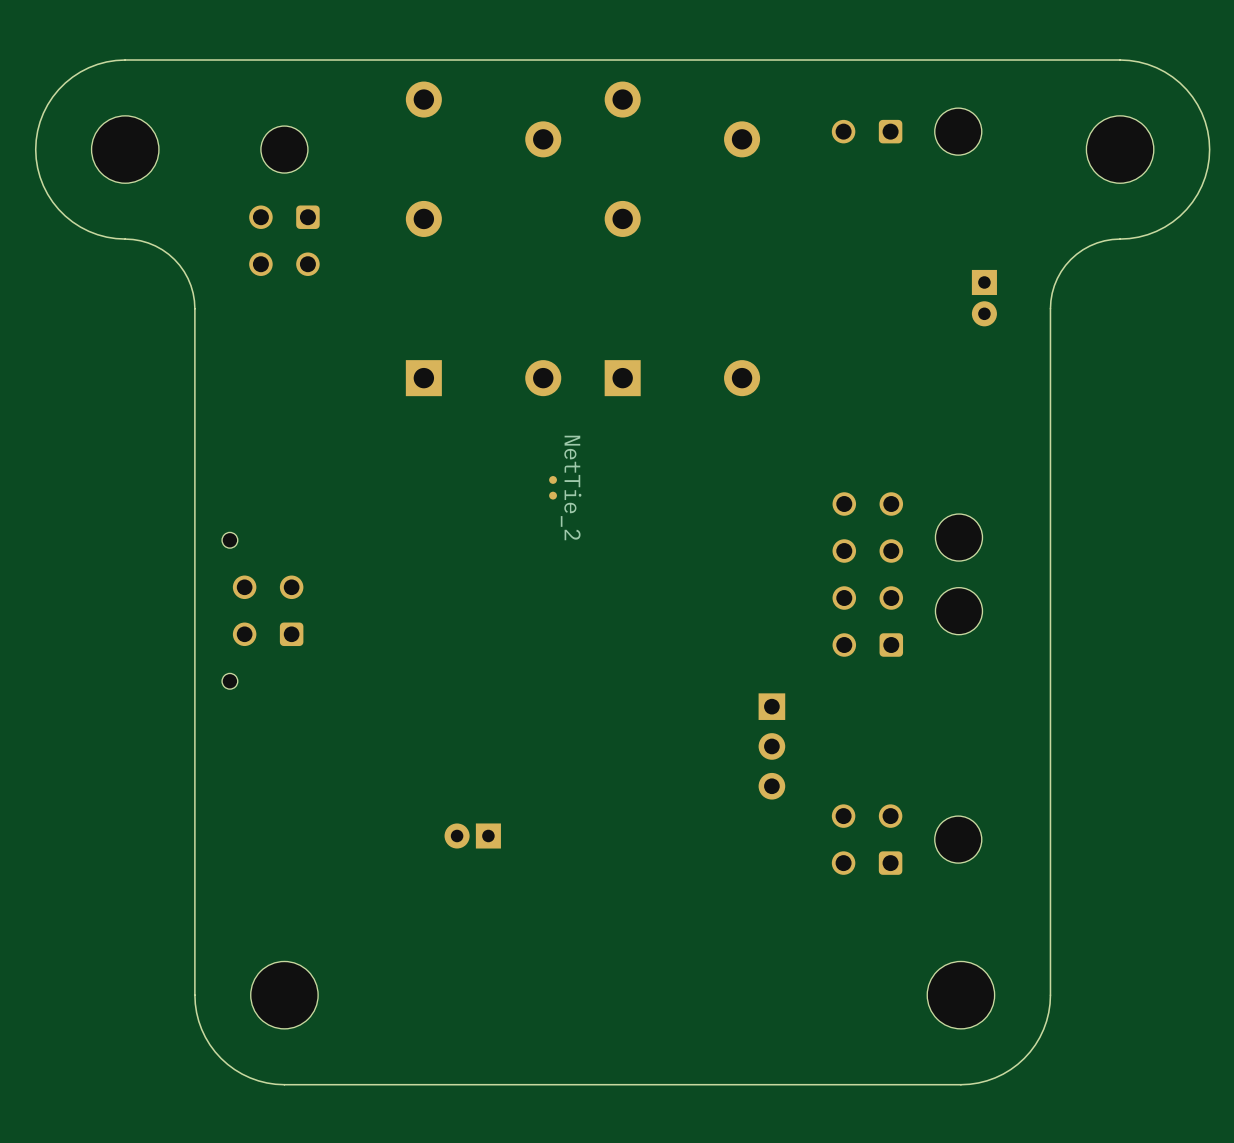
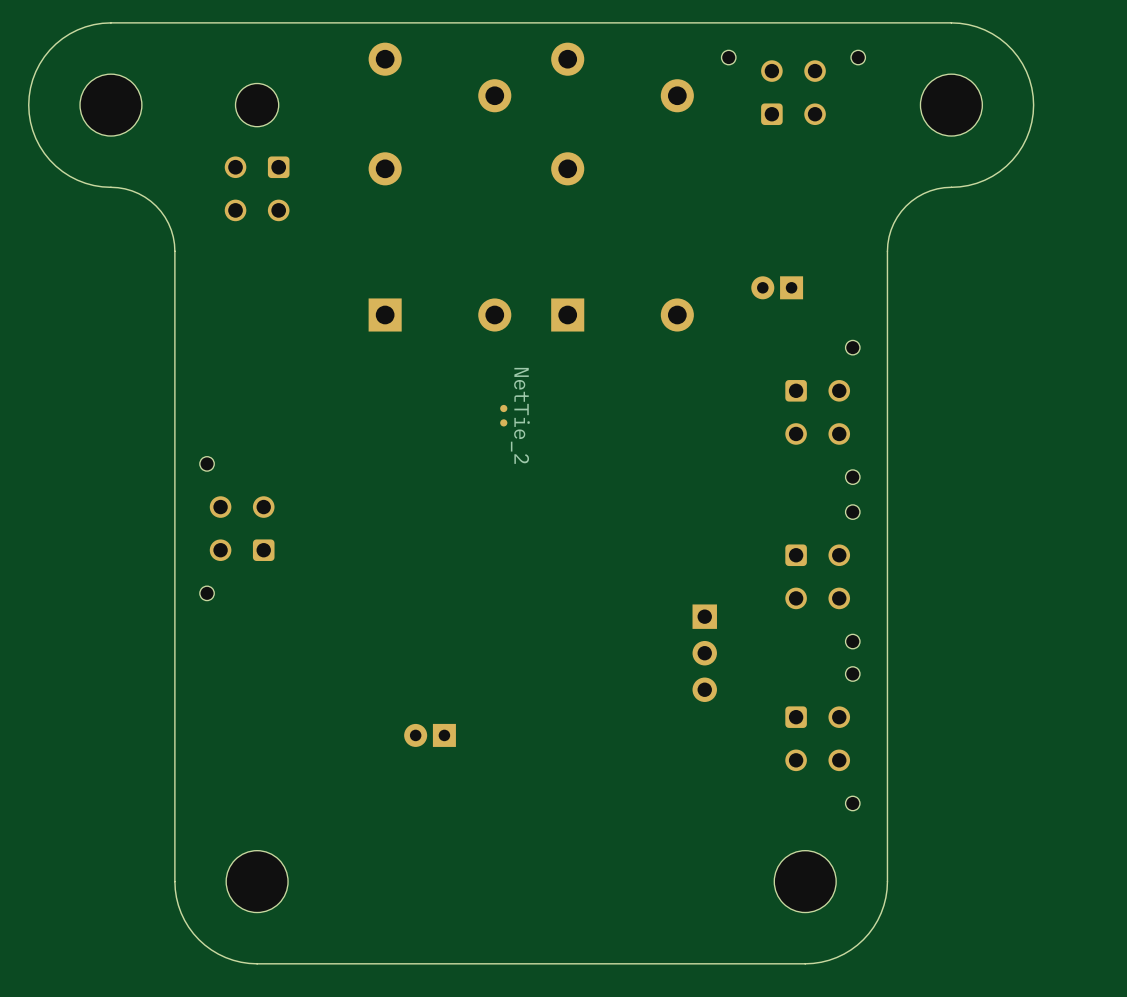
board edge: (1040, 60) (1129, 60) (1147, 64) (1164, 72) (1186, 89) (1201, 113) (1207, 130) (1209, 158) (1201, 185) (1192, 202) (1180, 216) (1164, 227) (1147, 234) (1104, 240) (1083, 249) (1065, 265) (1057, 278) (1052, 293) (1050, 308) (1050, 995) (1046, 1021) (1039, 1037) (1024, 1058) (1010, 1069) (995, 1077) (969, 1084) (881, 1084) -> (951, 22) (968, 24) (984, 29) (999, 38) (1012, 50) (1022, 63) (1029, 79) (1033, 96) (1033, 113) (1026, 138) (1017, 153) (1006, 166) (992, 176) (976, 183) (937, 188) (917, 197) (901, 211) (893, 223) (889, 237) (887, 251) (887, 889) (881, 913) (873, 927) (863, 939) (850, 949) (836, 957) (821, 962) (805, 963)
part: none -> (793, 87)
part: (906, 131) -> none
part position: (1120, 149) -> (951, 105)
part rotation: 0° (984, 298) -> 90° clockwise (777, 287)
part position: (984, 298) -> (777, 287)
part: none -> (822, 412)
part: (907, 574) -> none
part: none -> (822, 576)
part footprint: [831, 804, 982, 875] -> [785, 666, 860, 811]
part position: (960, 995) -> (805, 881)

